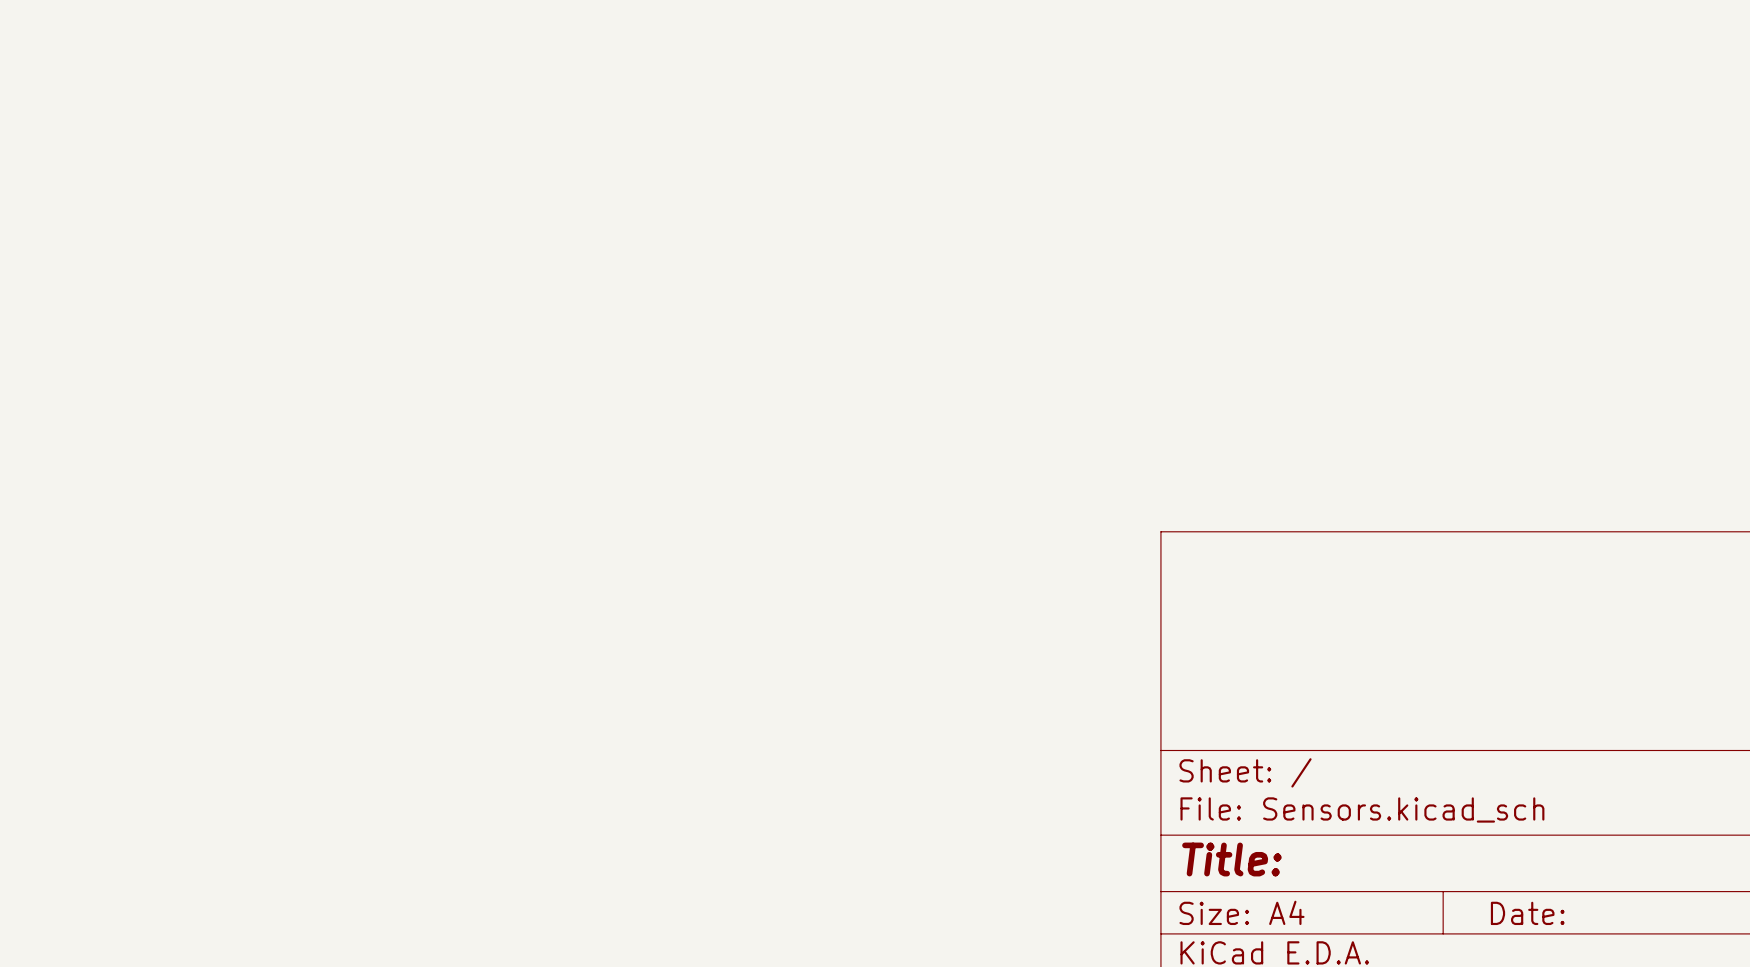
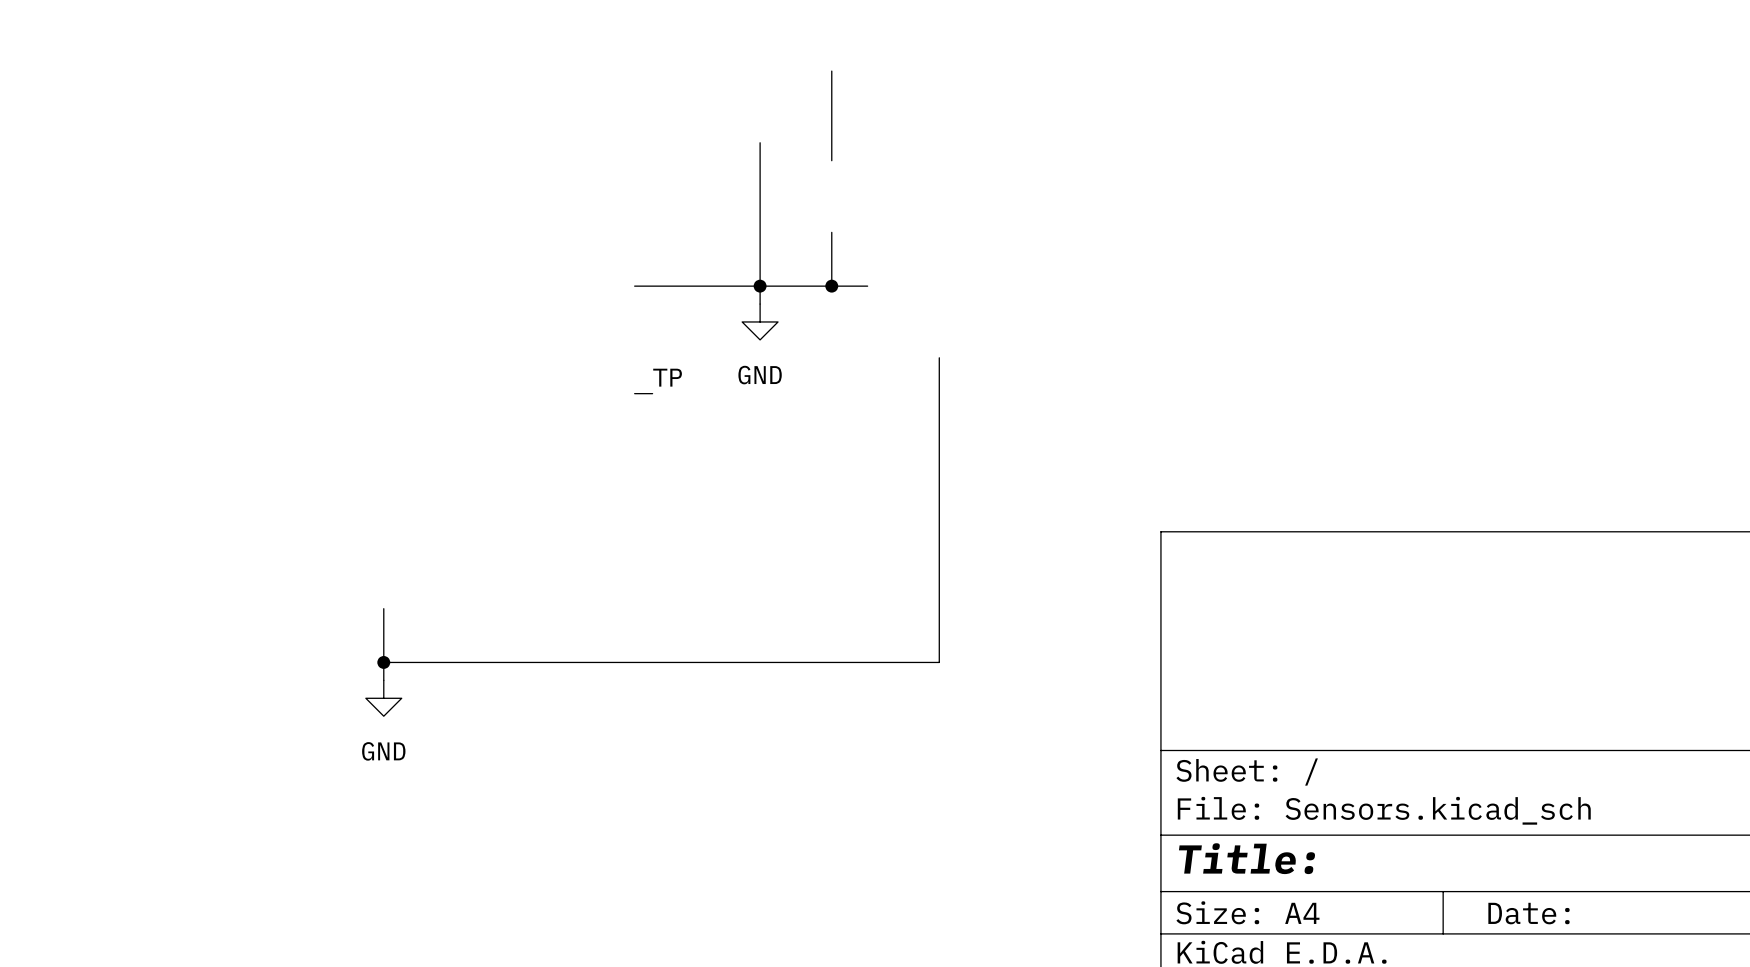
wire: none -> (831, 71) (831, 160)
wire: none -> (760, 142) (760, 304)
wire: none -> (831, 232) (831, 286)
wire: none -> (634, 286) (867, 286)
junction: none -> (760, 286)
junction: none -> (831, 286)
power symbol: none -> GND (760, 321)
wire: none -> (939, 357) (939, 662) (383, 662)
label: none -> TP (667, 377)
wire: none -> (634, 393) (652, 393)
wire: none -> (383, 608) (383, 680)
junction: none -> (383, 662)
power symbol: none -> GND (383, 698)

